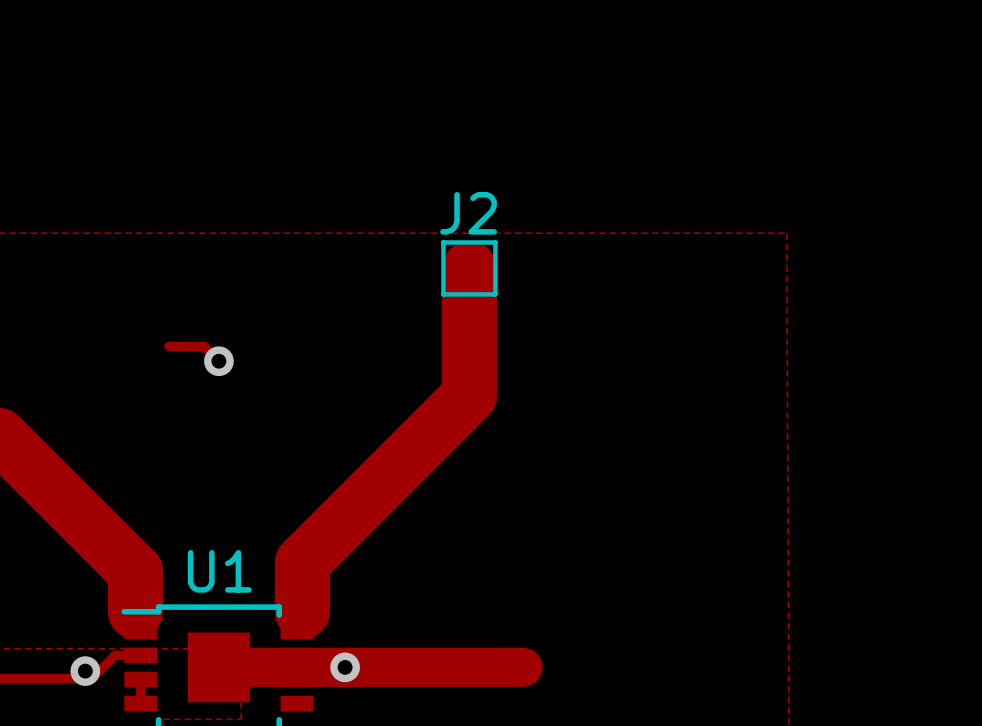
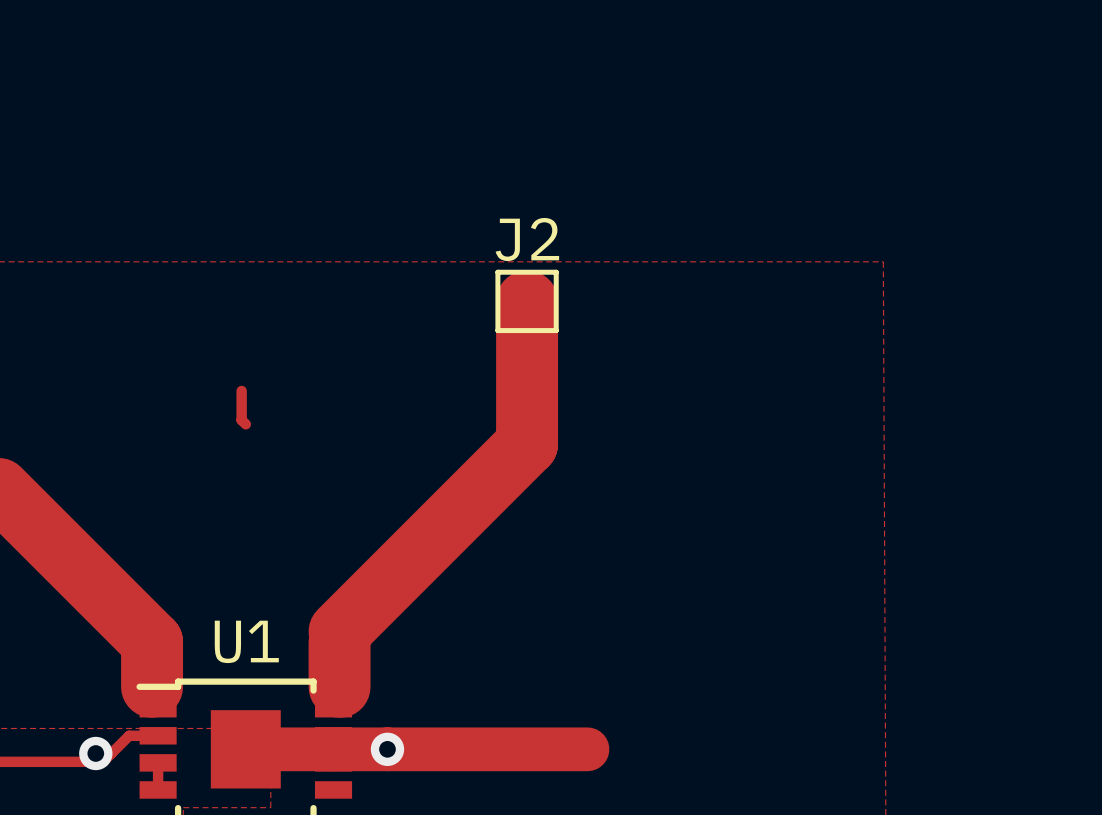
top track: (168, 346) (204, 346) (218, 361) -> none
top track: none -> (241, 390) (241, 420) (245, 424)
via: (218, 361) -> none

